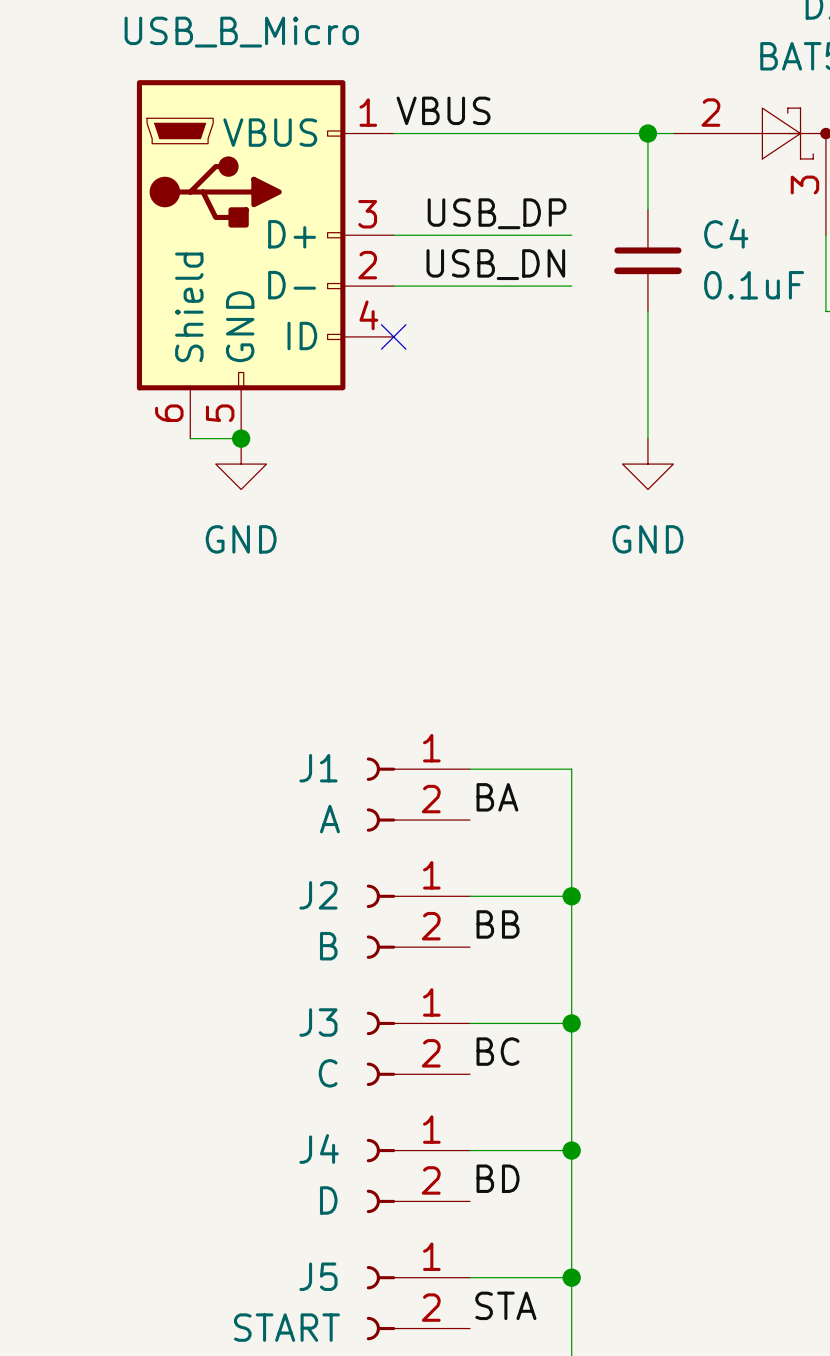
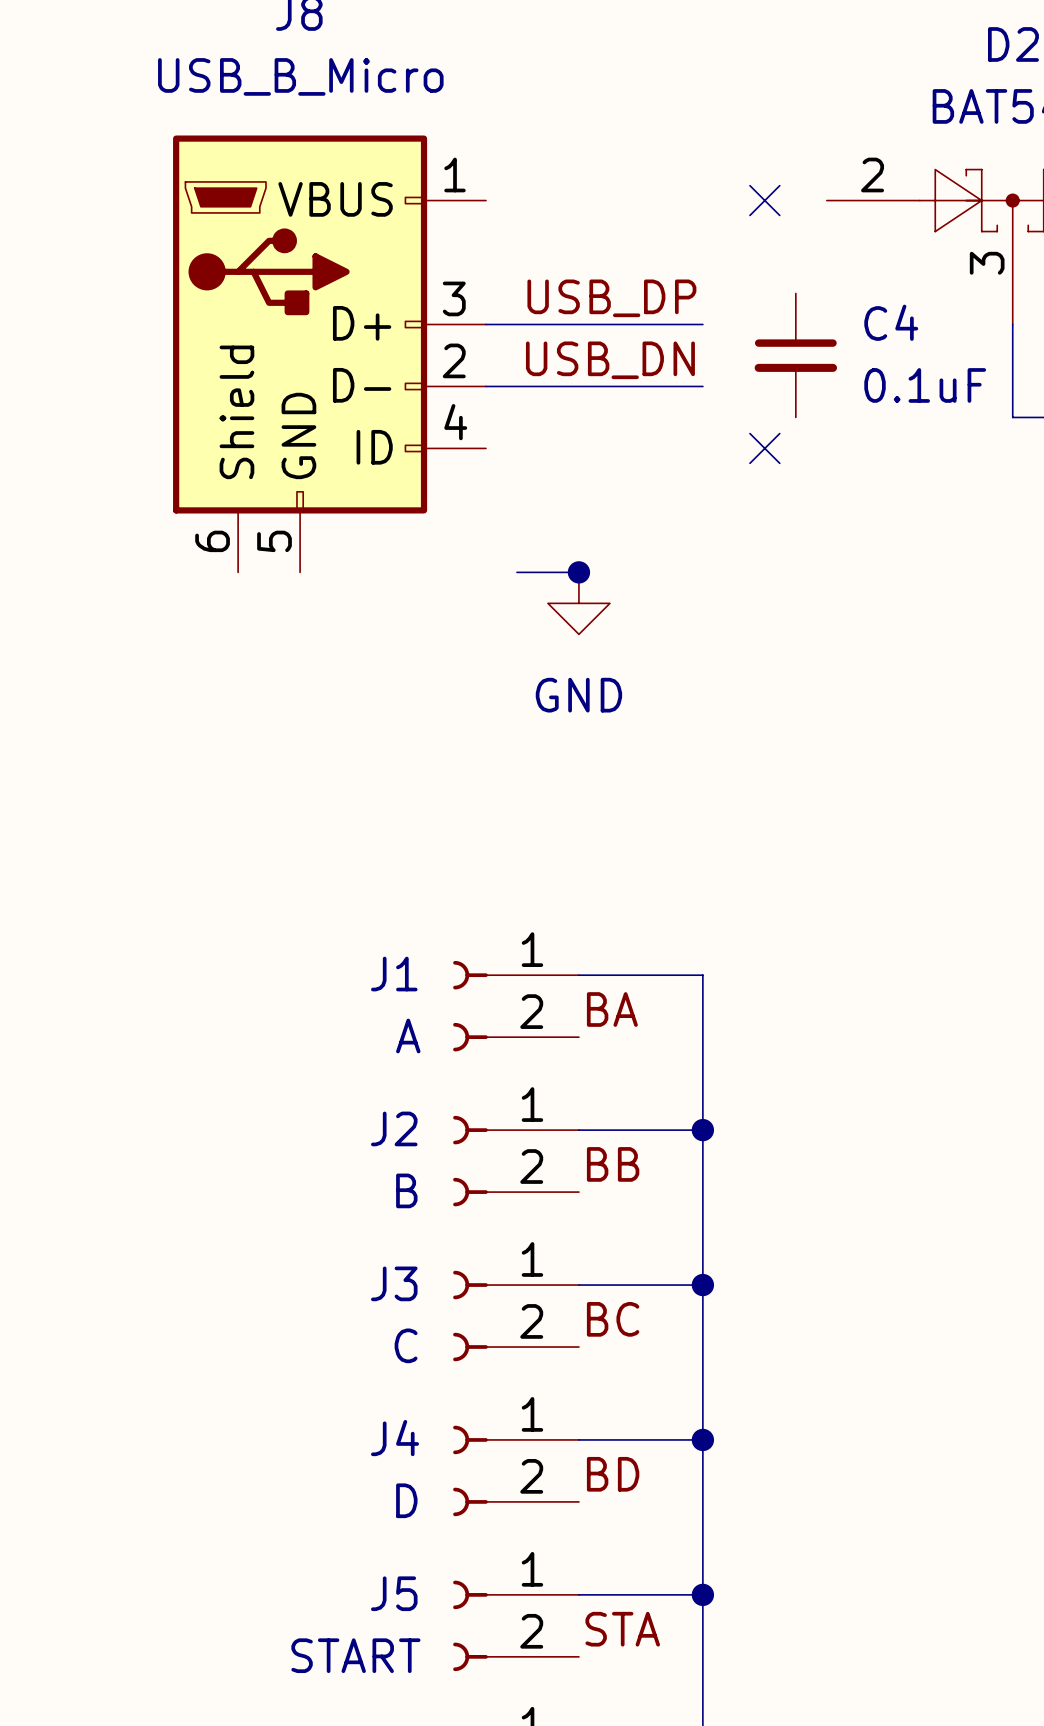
label: VBUS (443, 110) -> none
wire: (393, 133) (673, 133) -> none
no-connect mark: none -> (764, 200)
wire: (647, 133) (647, 209) -> none
junction: (647, 133) -> none
wire: (647, 311) (647, 438) -> none
no-connect mark: (393, 336) -> none
no-connect mark: none -> (764, 448)
wire: (190, 438) (241, 438) -> (516, 572) (578, 572)
junction: (241, 438) -> none
junction: none -> (578, 572)
power symbol: GND (241, 464) -> none
power symbol: none -> GND (578, 603)
power symbol: GND (647, 464) -> none

